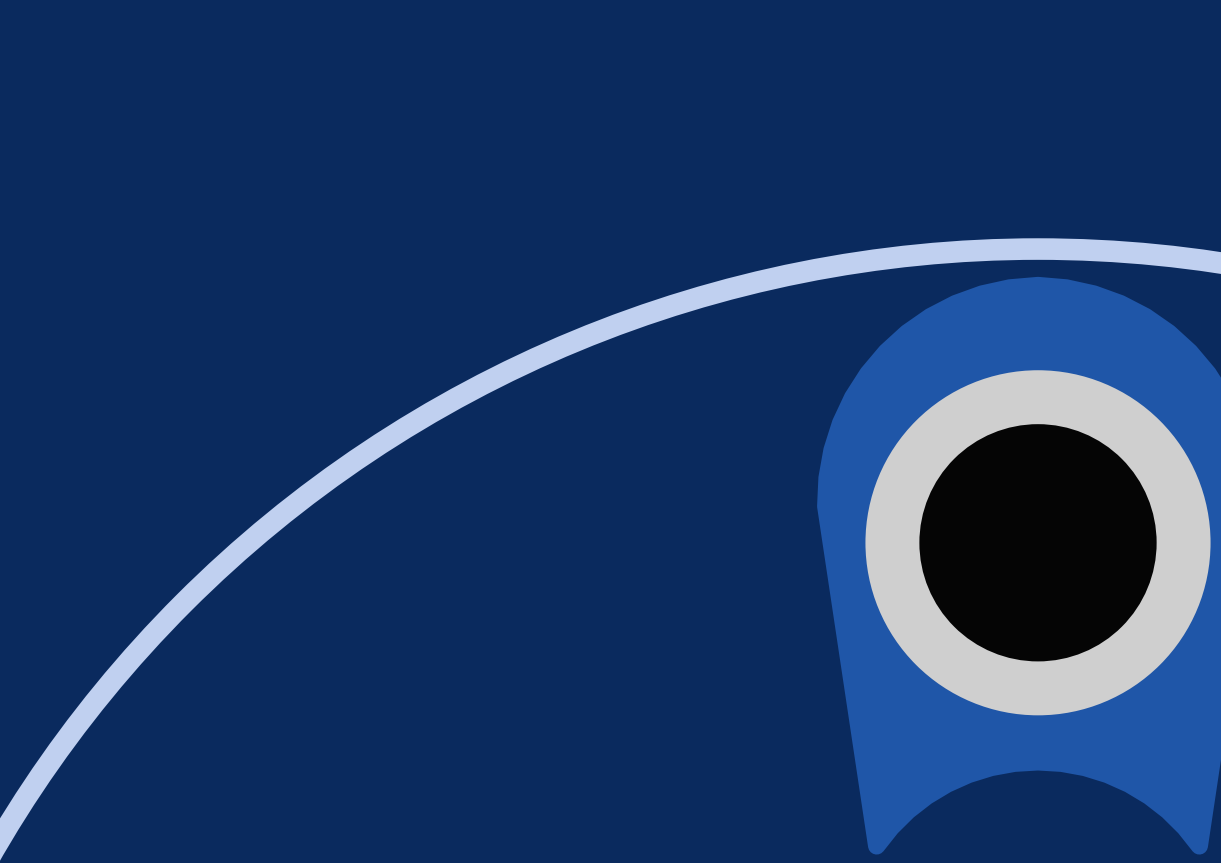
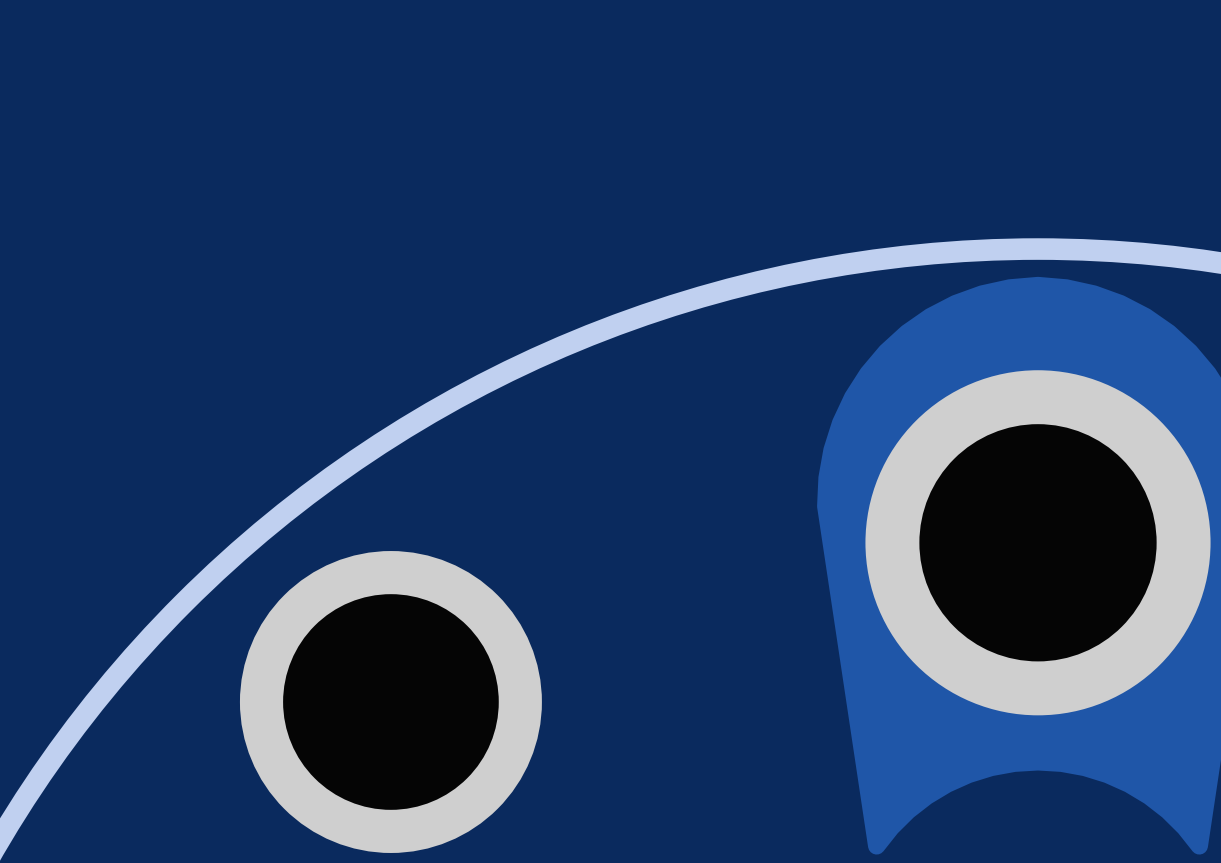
part: none -> (390, 702)

